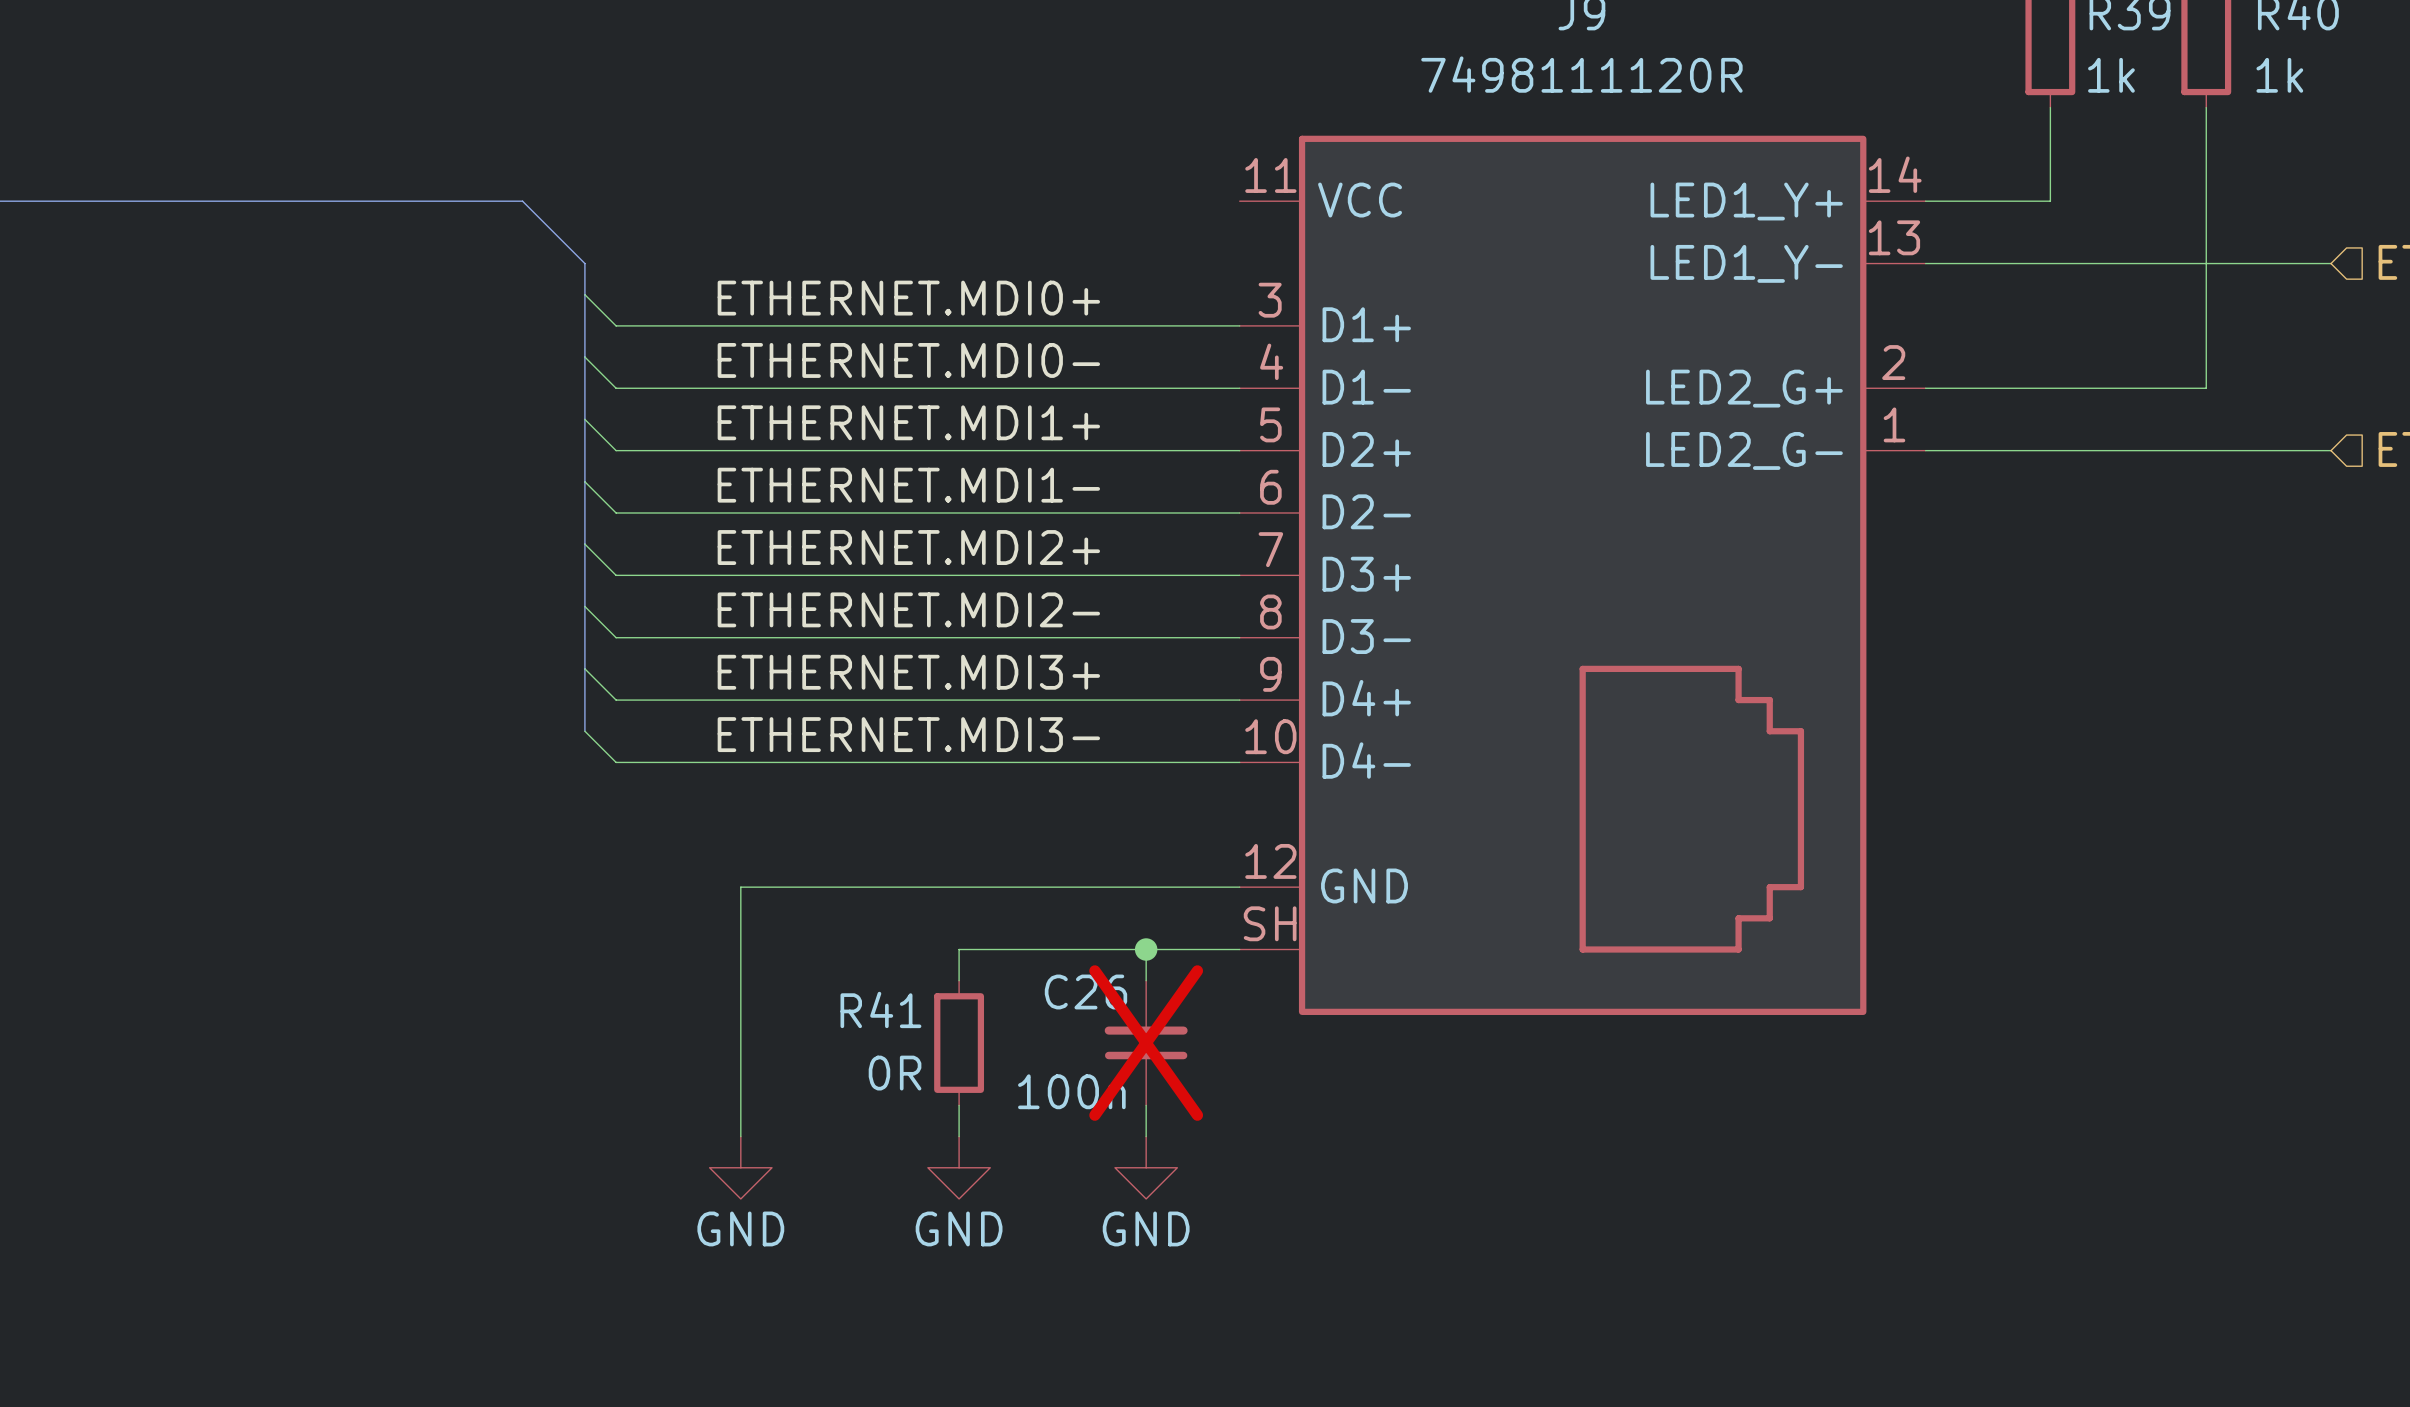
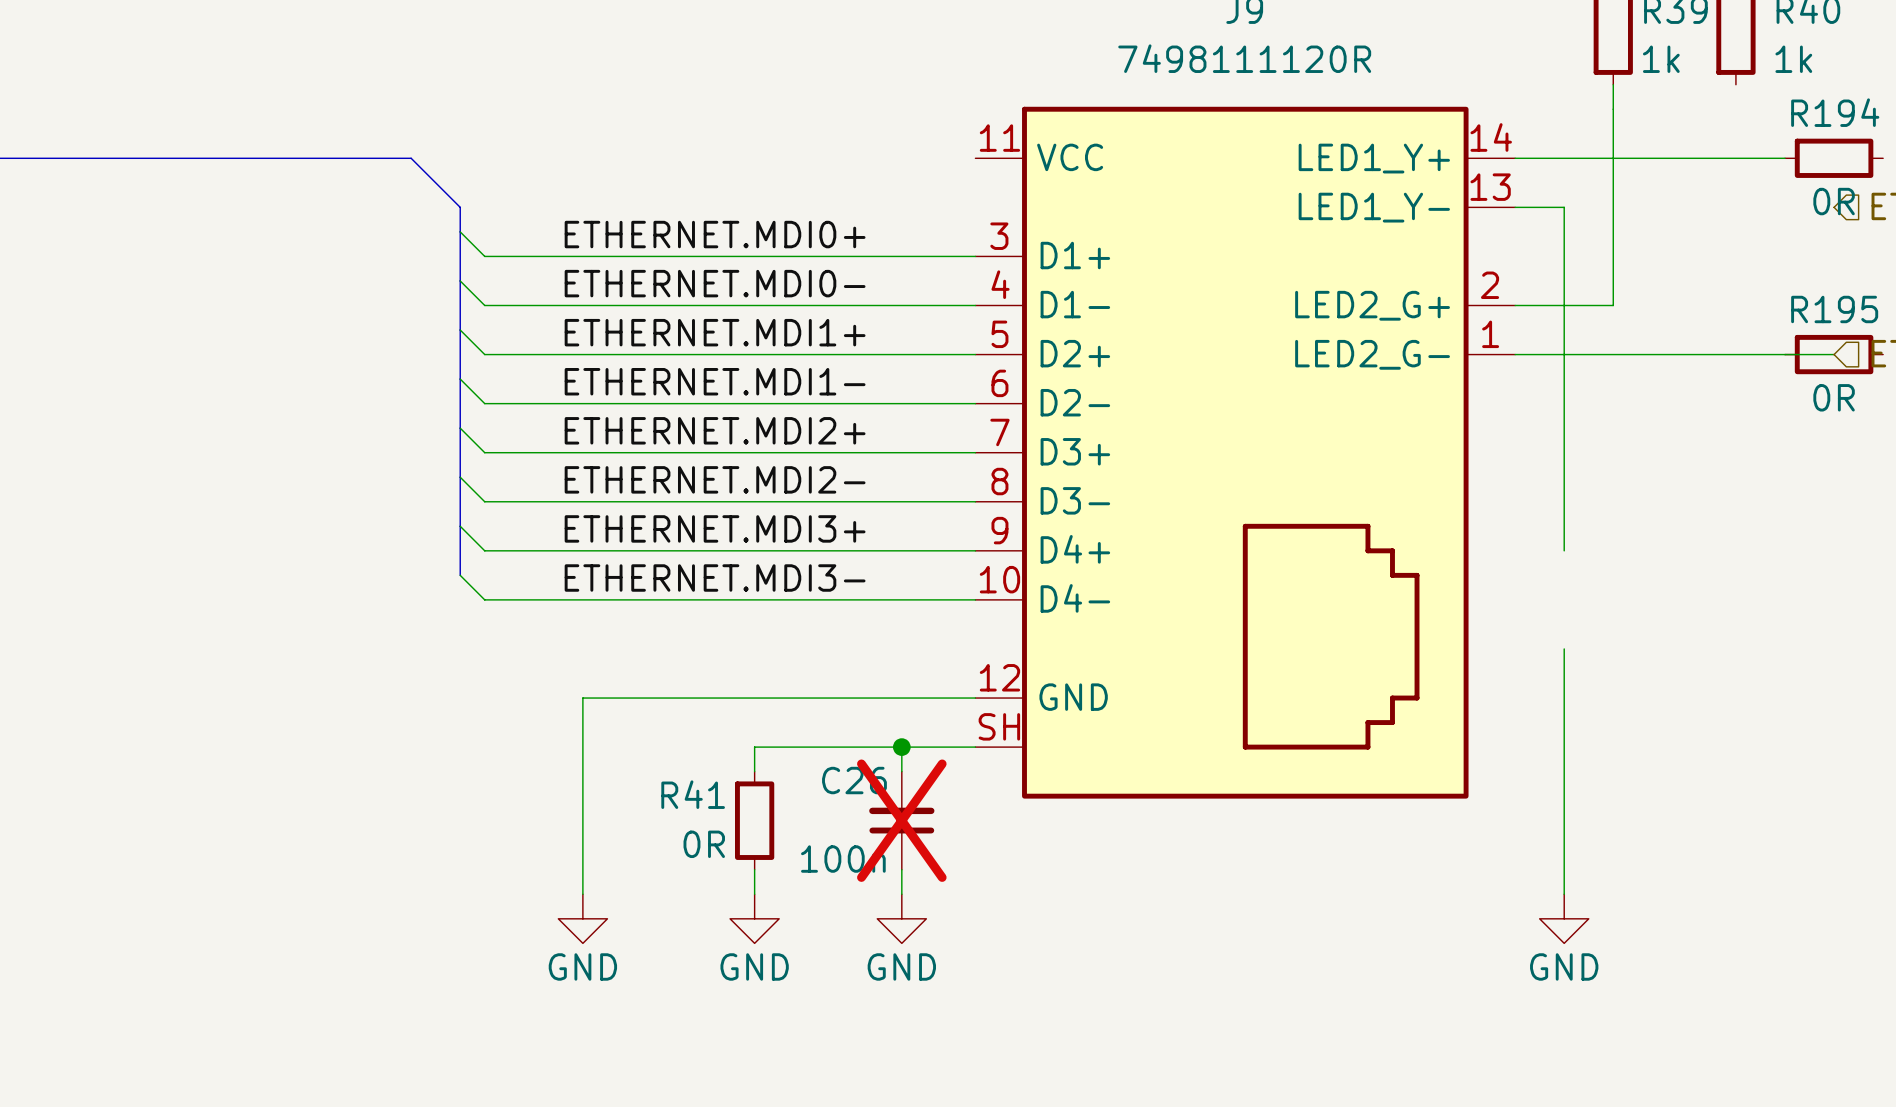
wire: (2206, 107) (2206, 388) (2050, 388) -> (1785, 158) (1613, 158) (1613, 305)
R194: none -> (1834, 158)
wire: (1988, 263) (2330, 263) -> (1564, 207) (1564, 550)
R195: none -> (1834, 354)
wire: none -> (1564, 648) (1564, 894)
power symbol: none -> GND (1564, 918)

